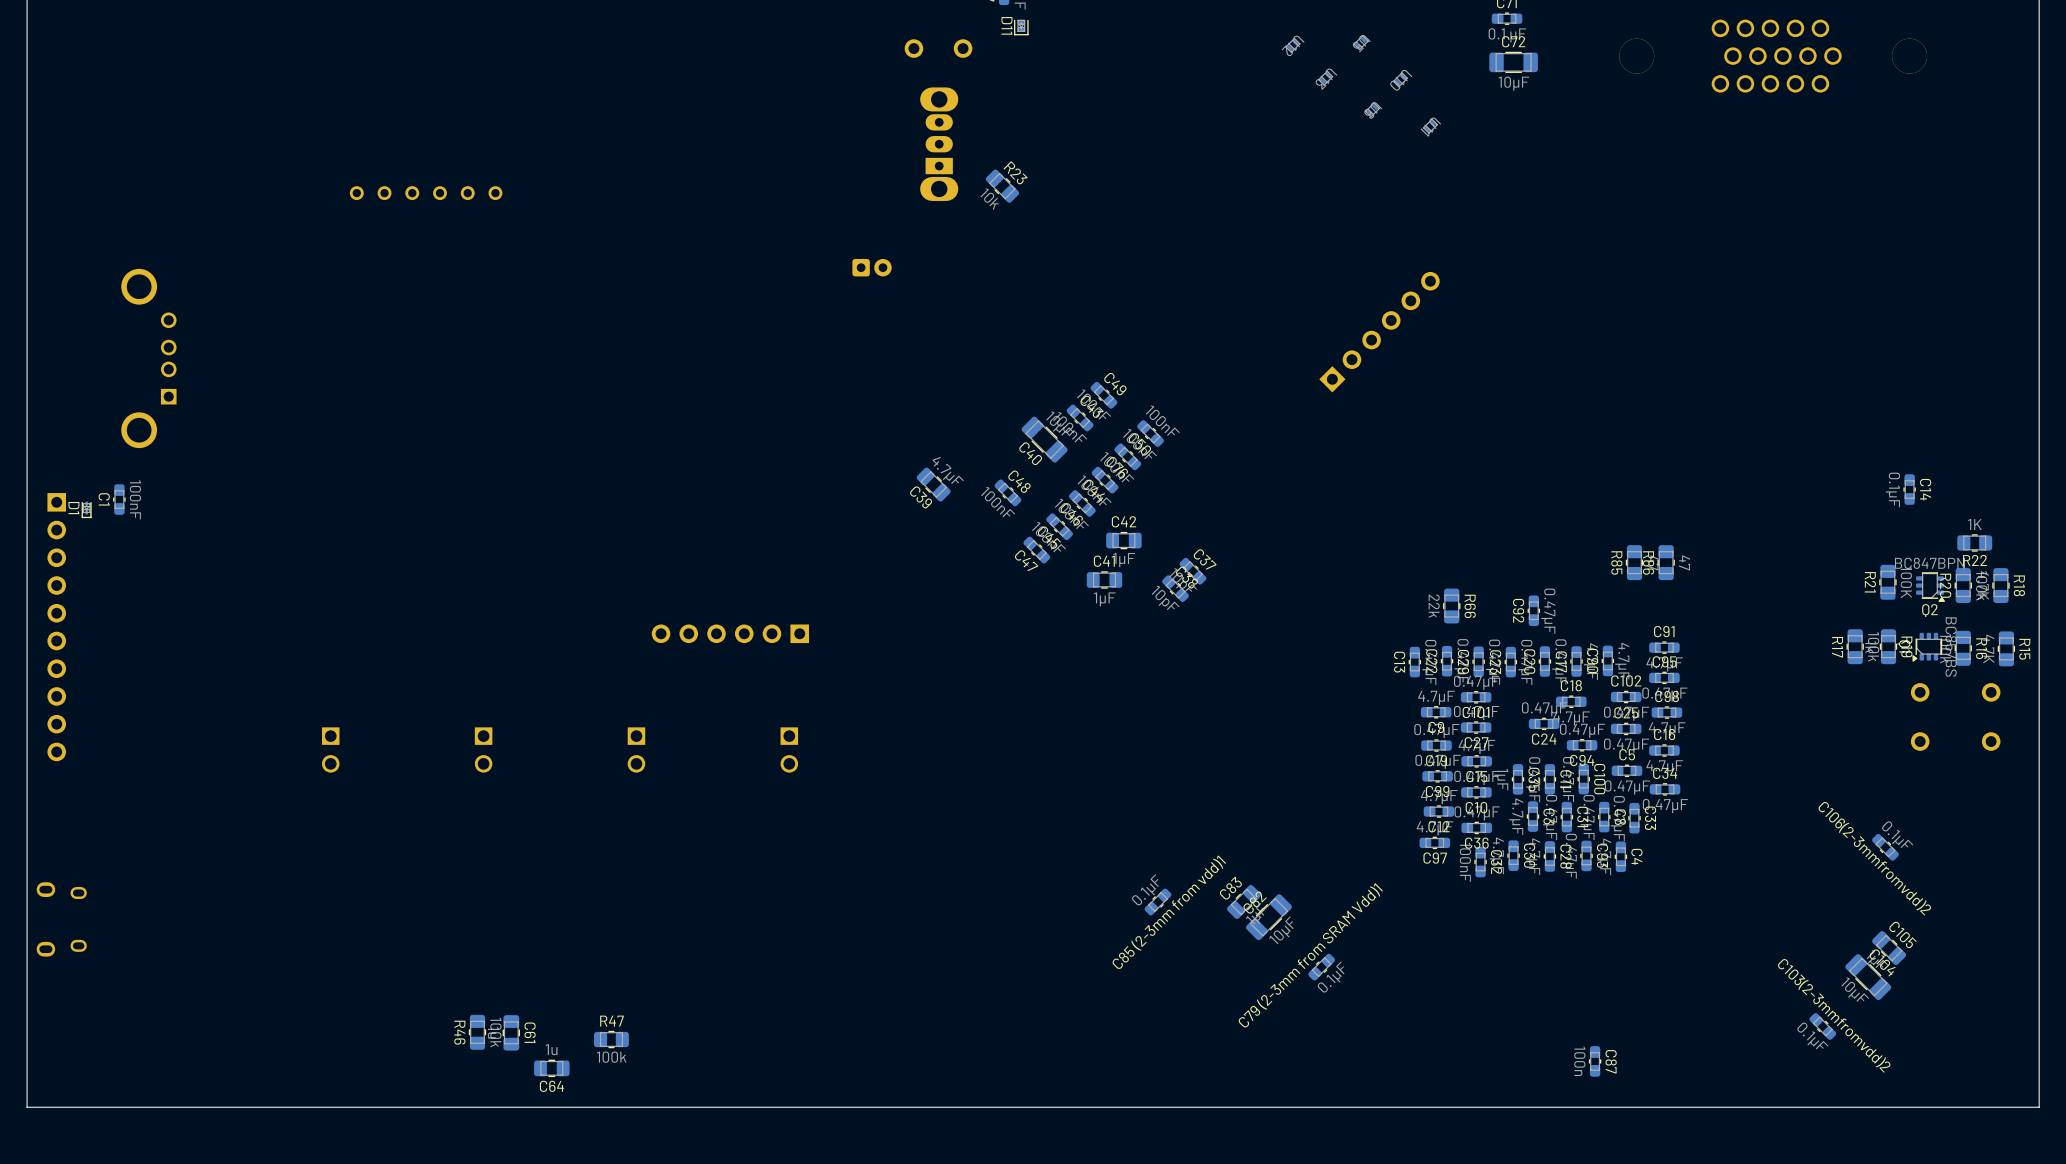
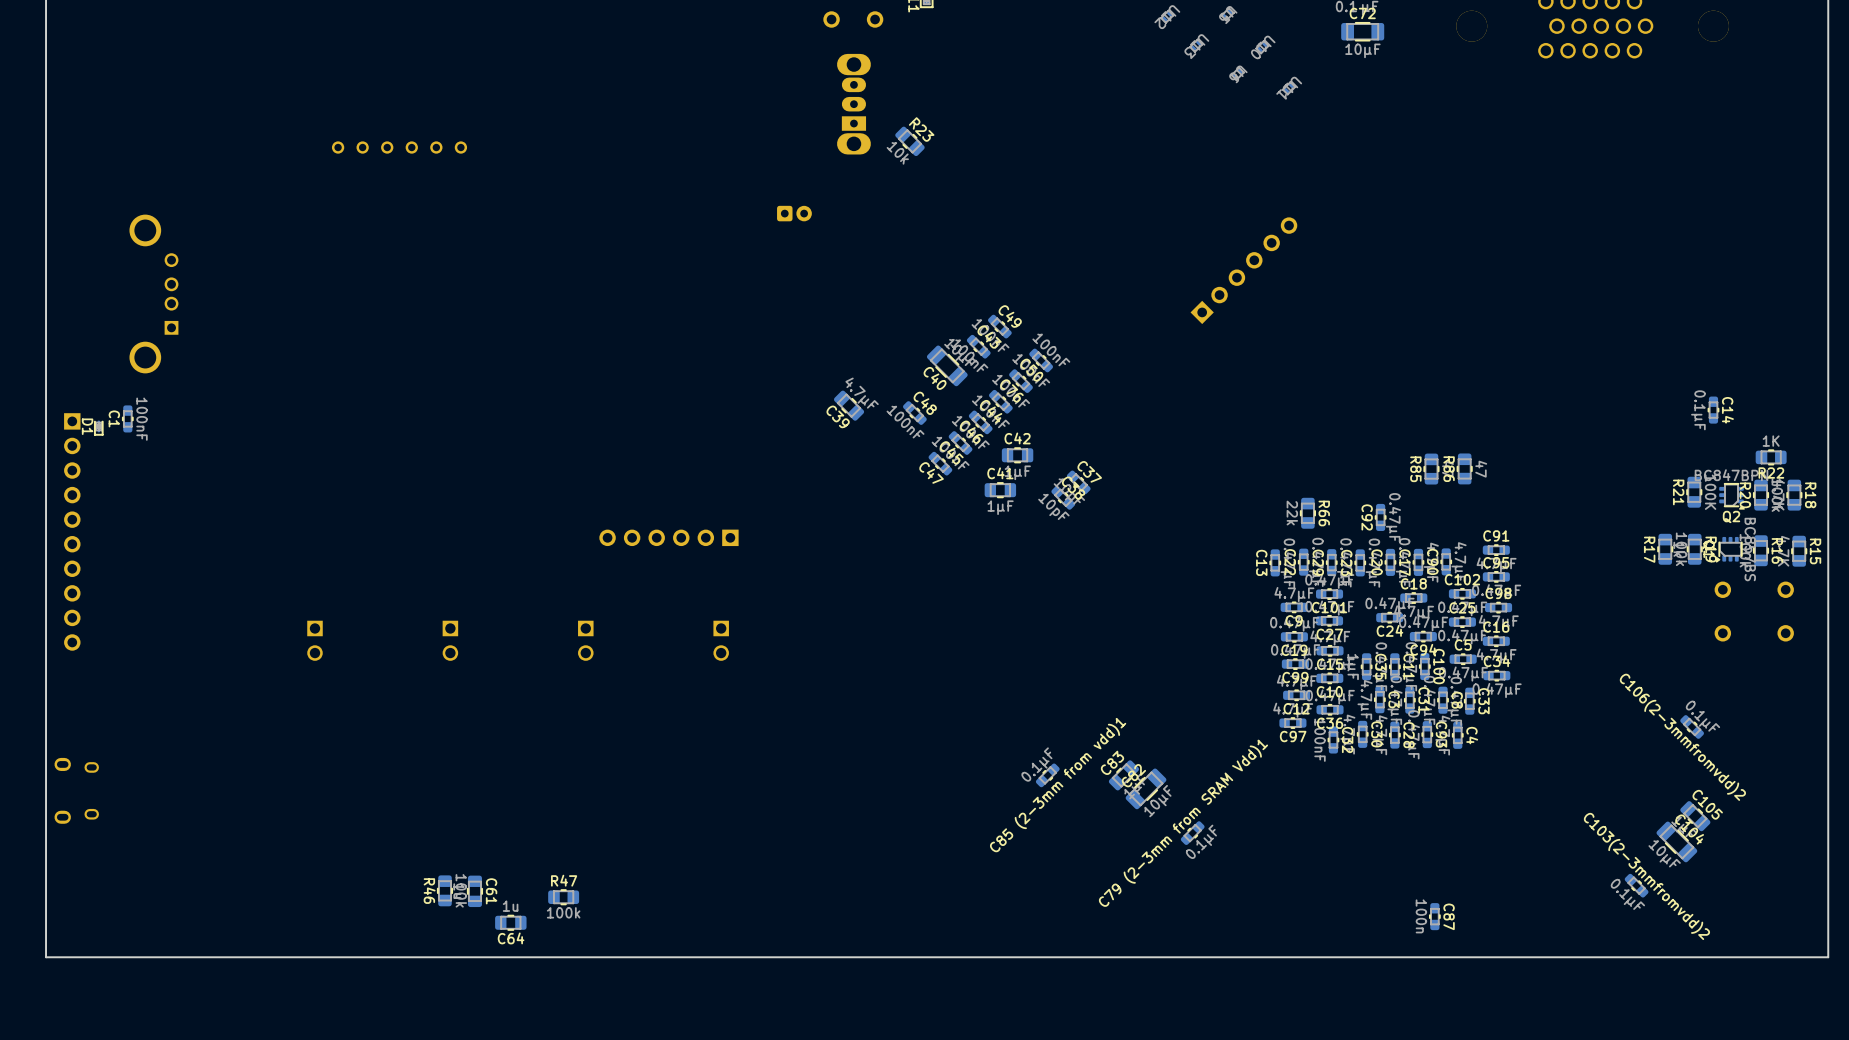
R85 position: (1634, 562) -> (1431, 469)
R86 position: (1666, 562) -> (1464, 468)

